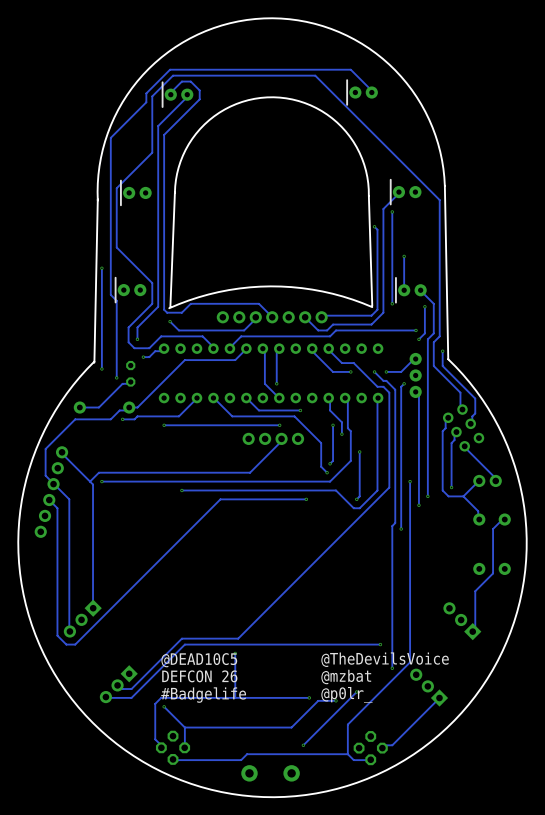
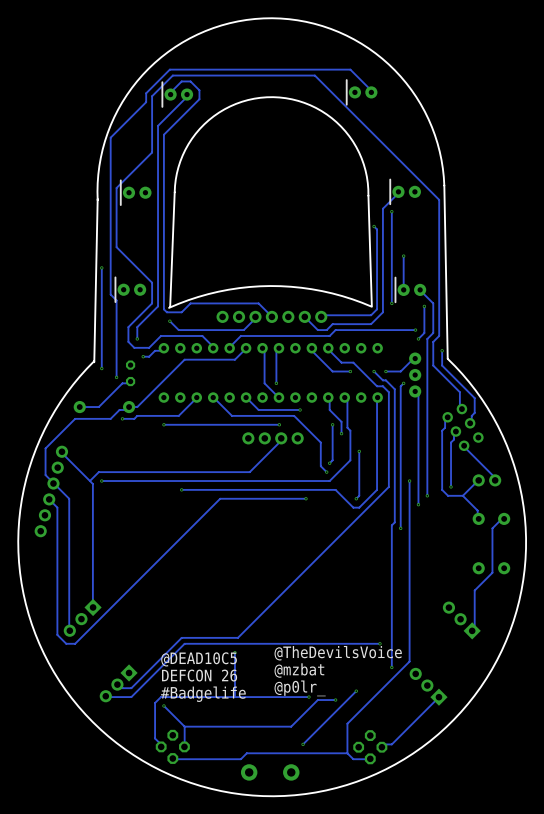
text position: @TheDevilsVoice (385, 659) -> @TheDevilsVoice (338, 653)
text position: @mzbat (346, 677) -> @mzbat (299, 670)
text position: @p0lr_ (346, 694) -> @p0lr_ (300, 688)

